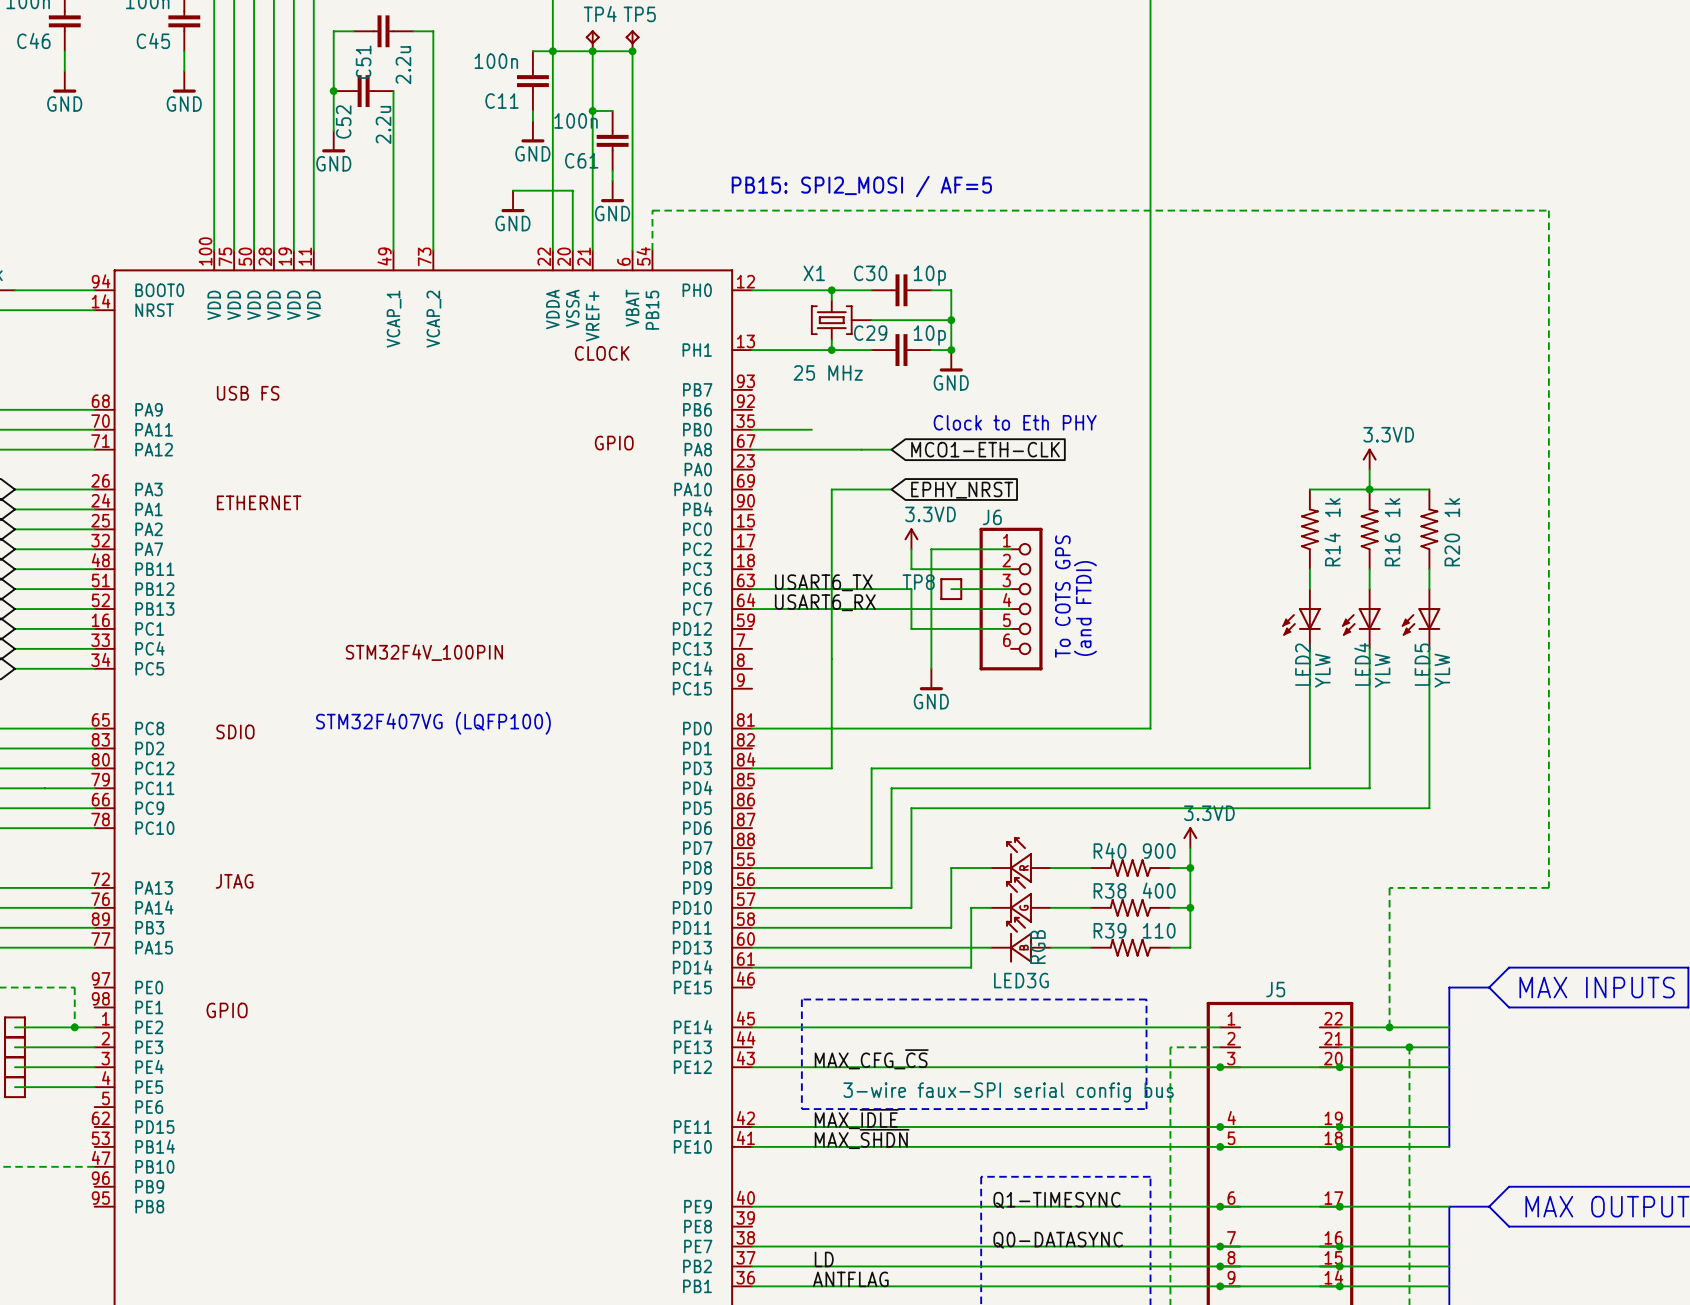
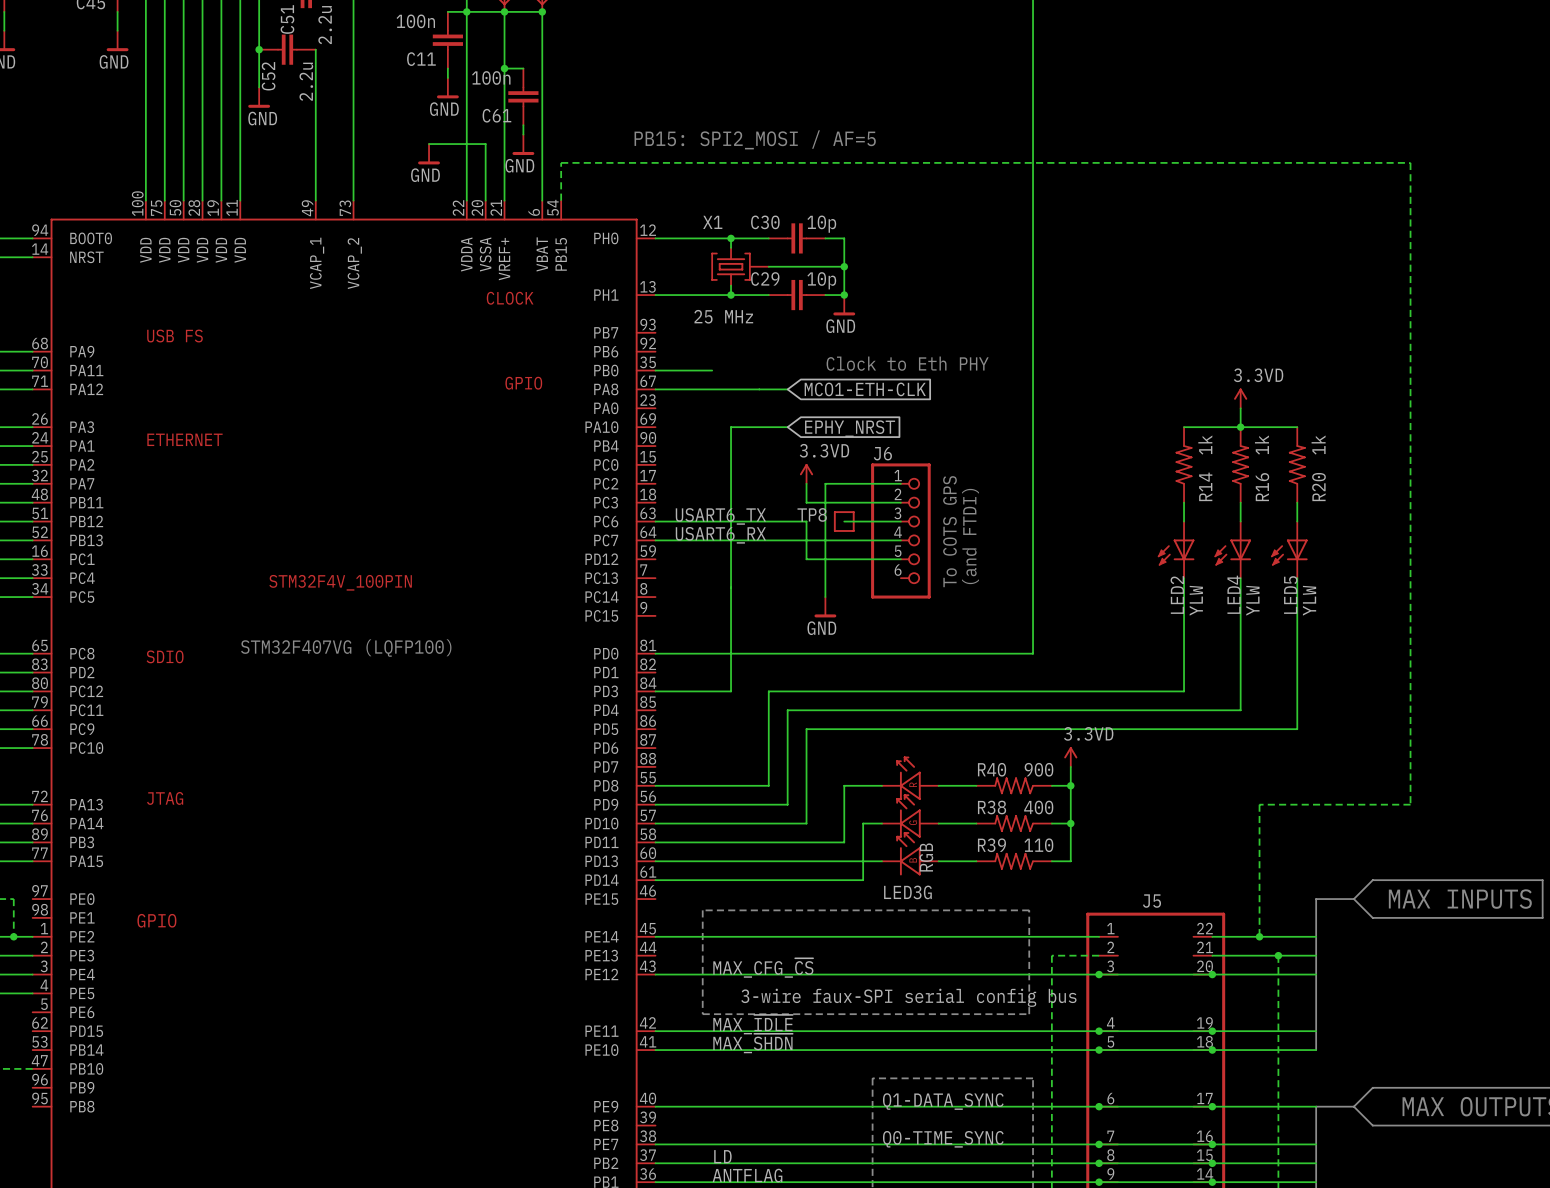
label: Q1-TIMESYNC (1057, 1200) -> Q1-DATA_SYNC (943, 1101)
label: Q0-DATASYNC (1058, 1240) -> Q0-TIME_SYNC (943, 1139)

